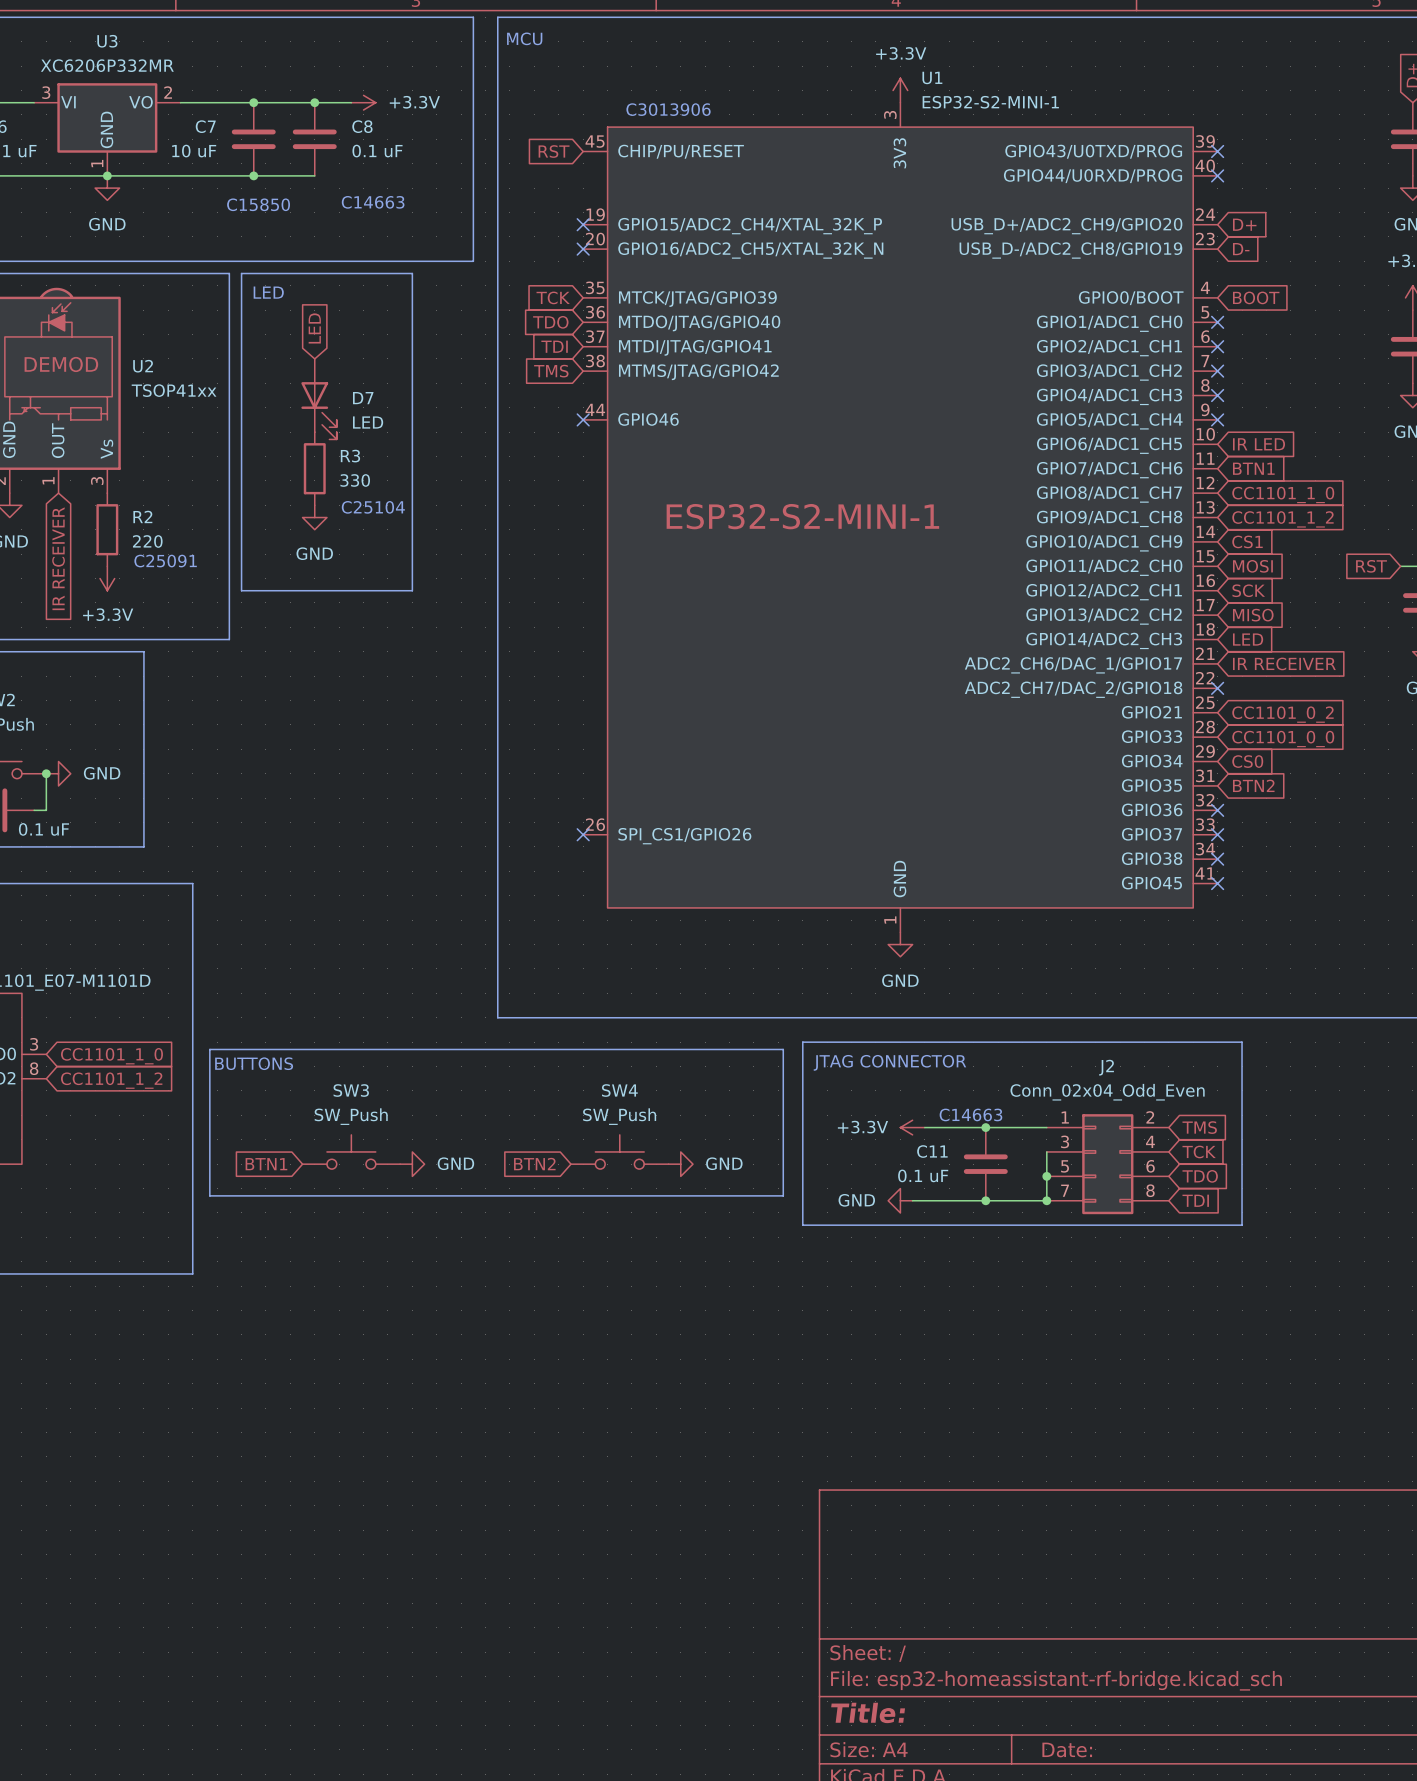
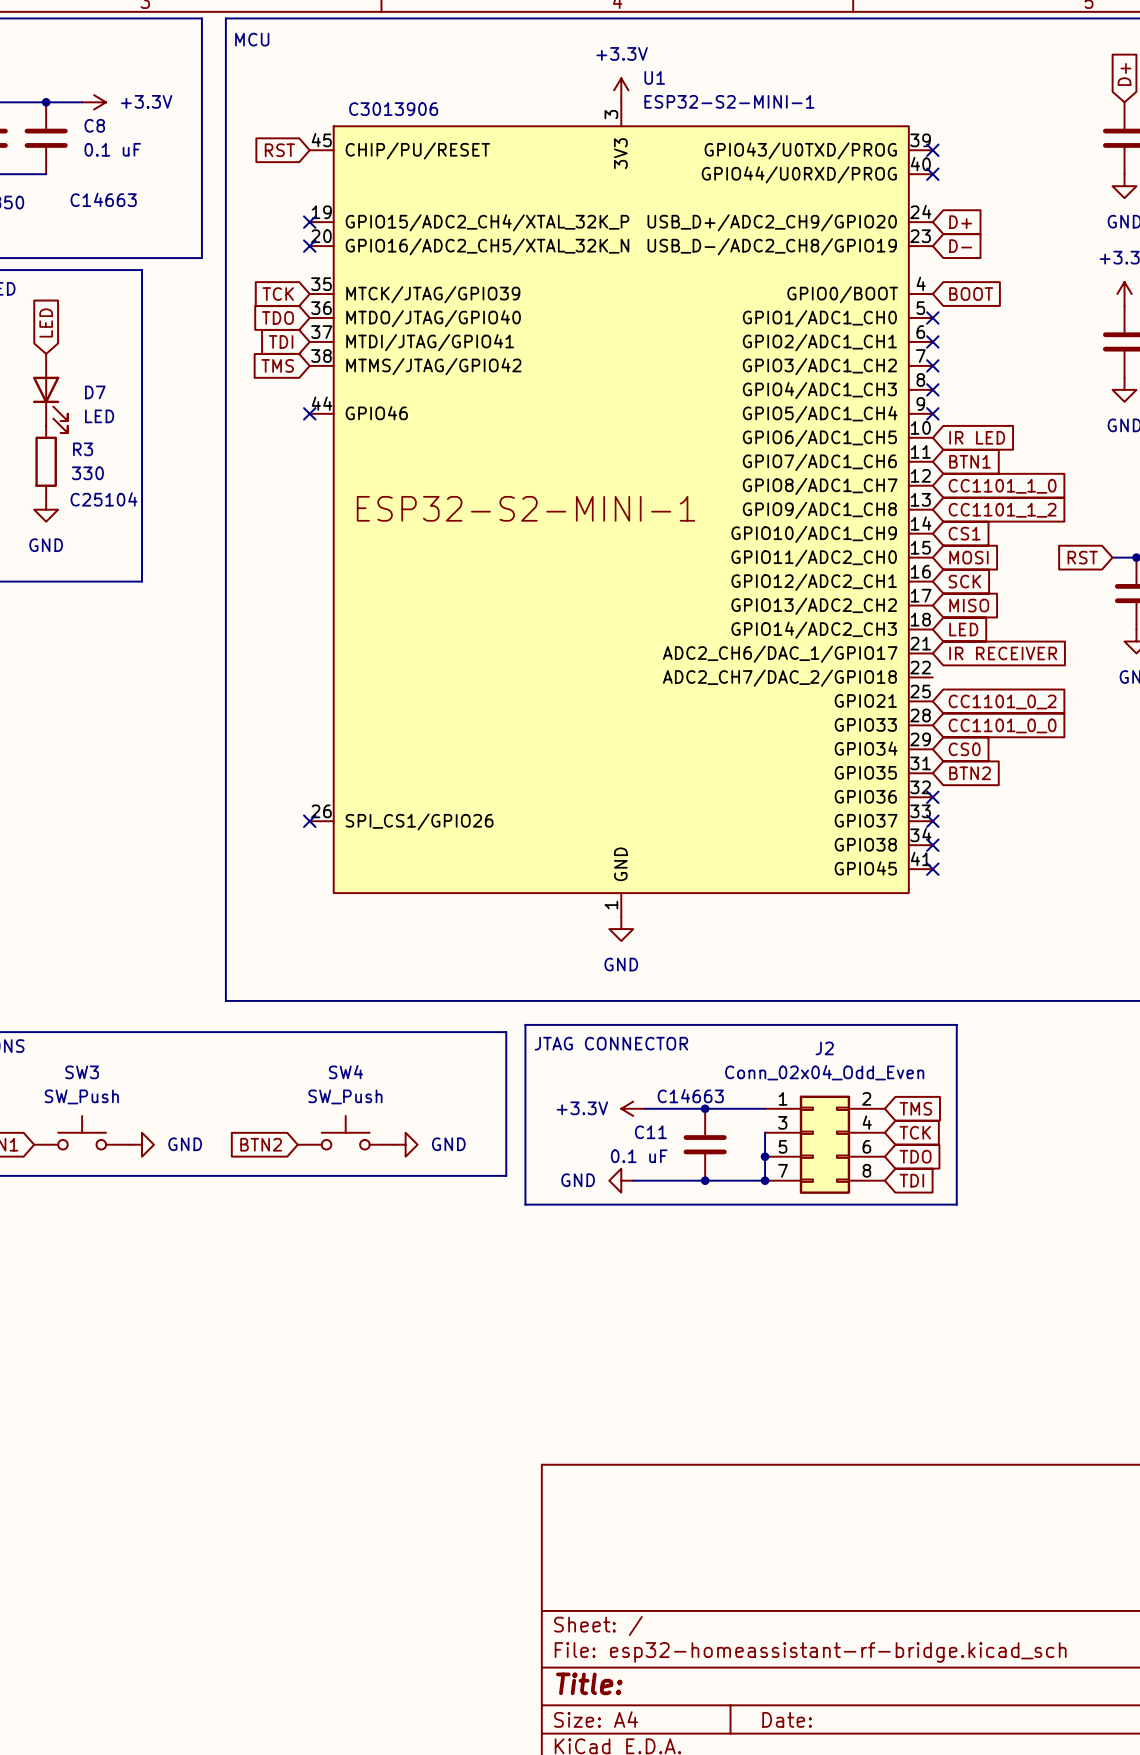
no-connect mark: (1217, 688) -> none

